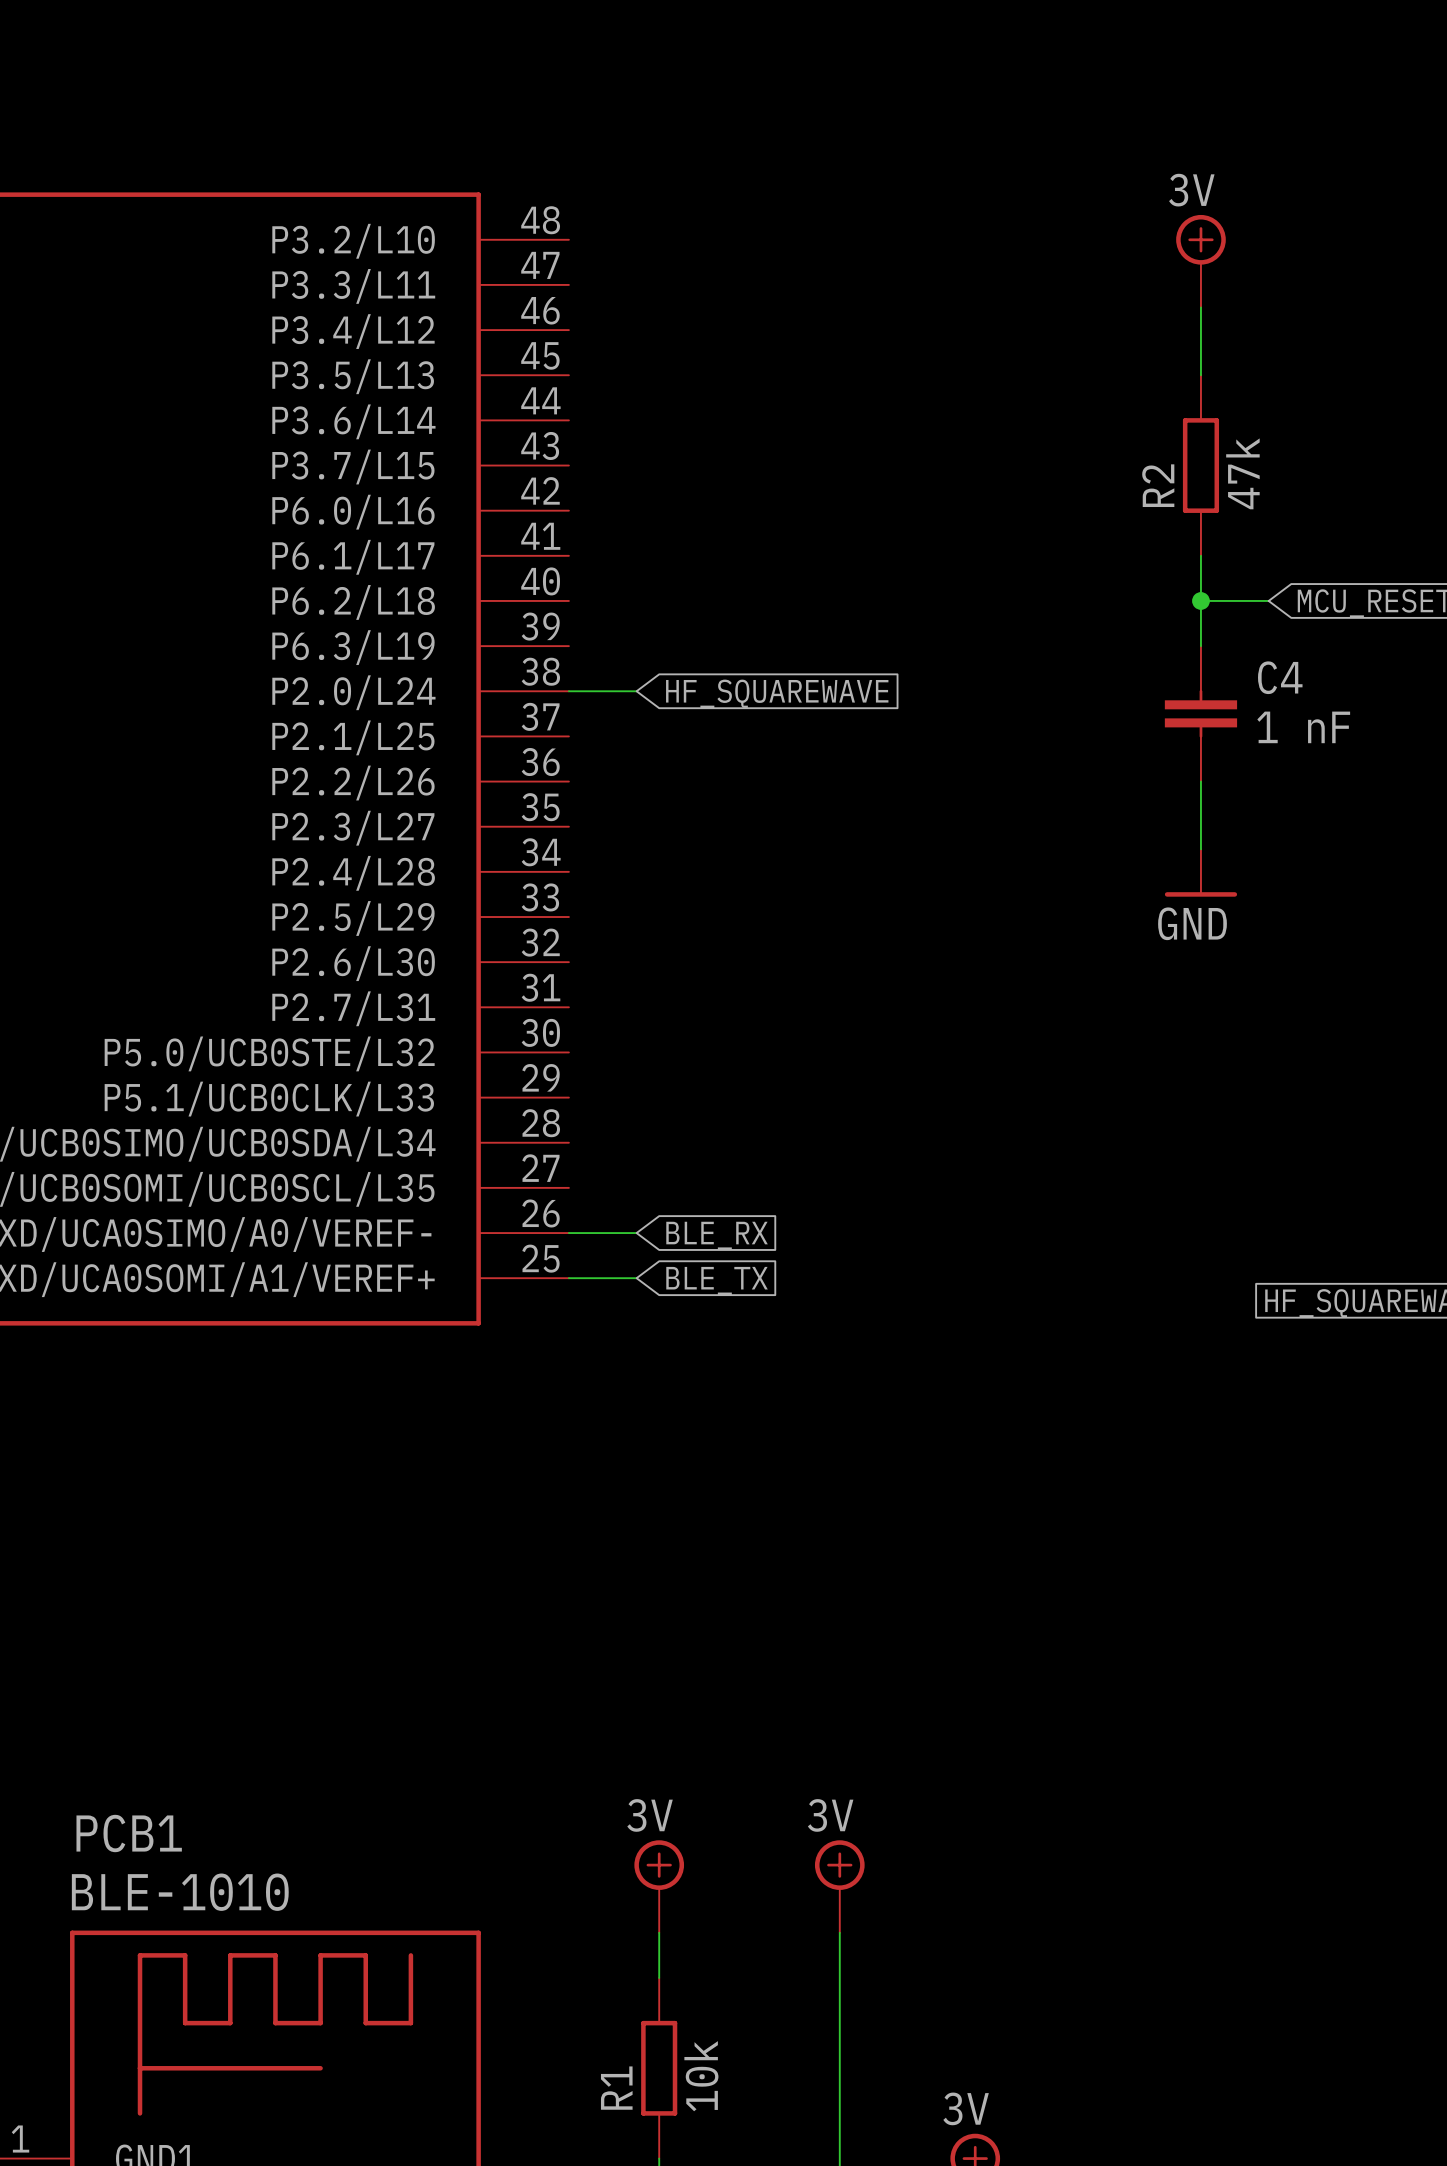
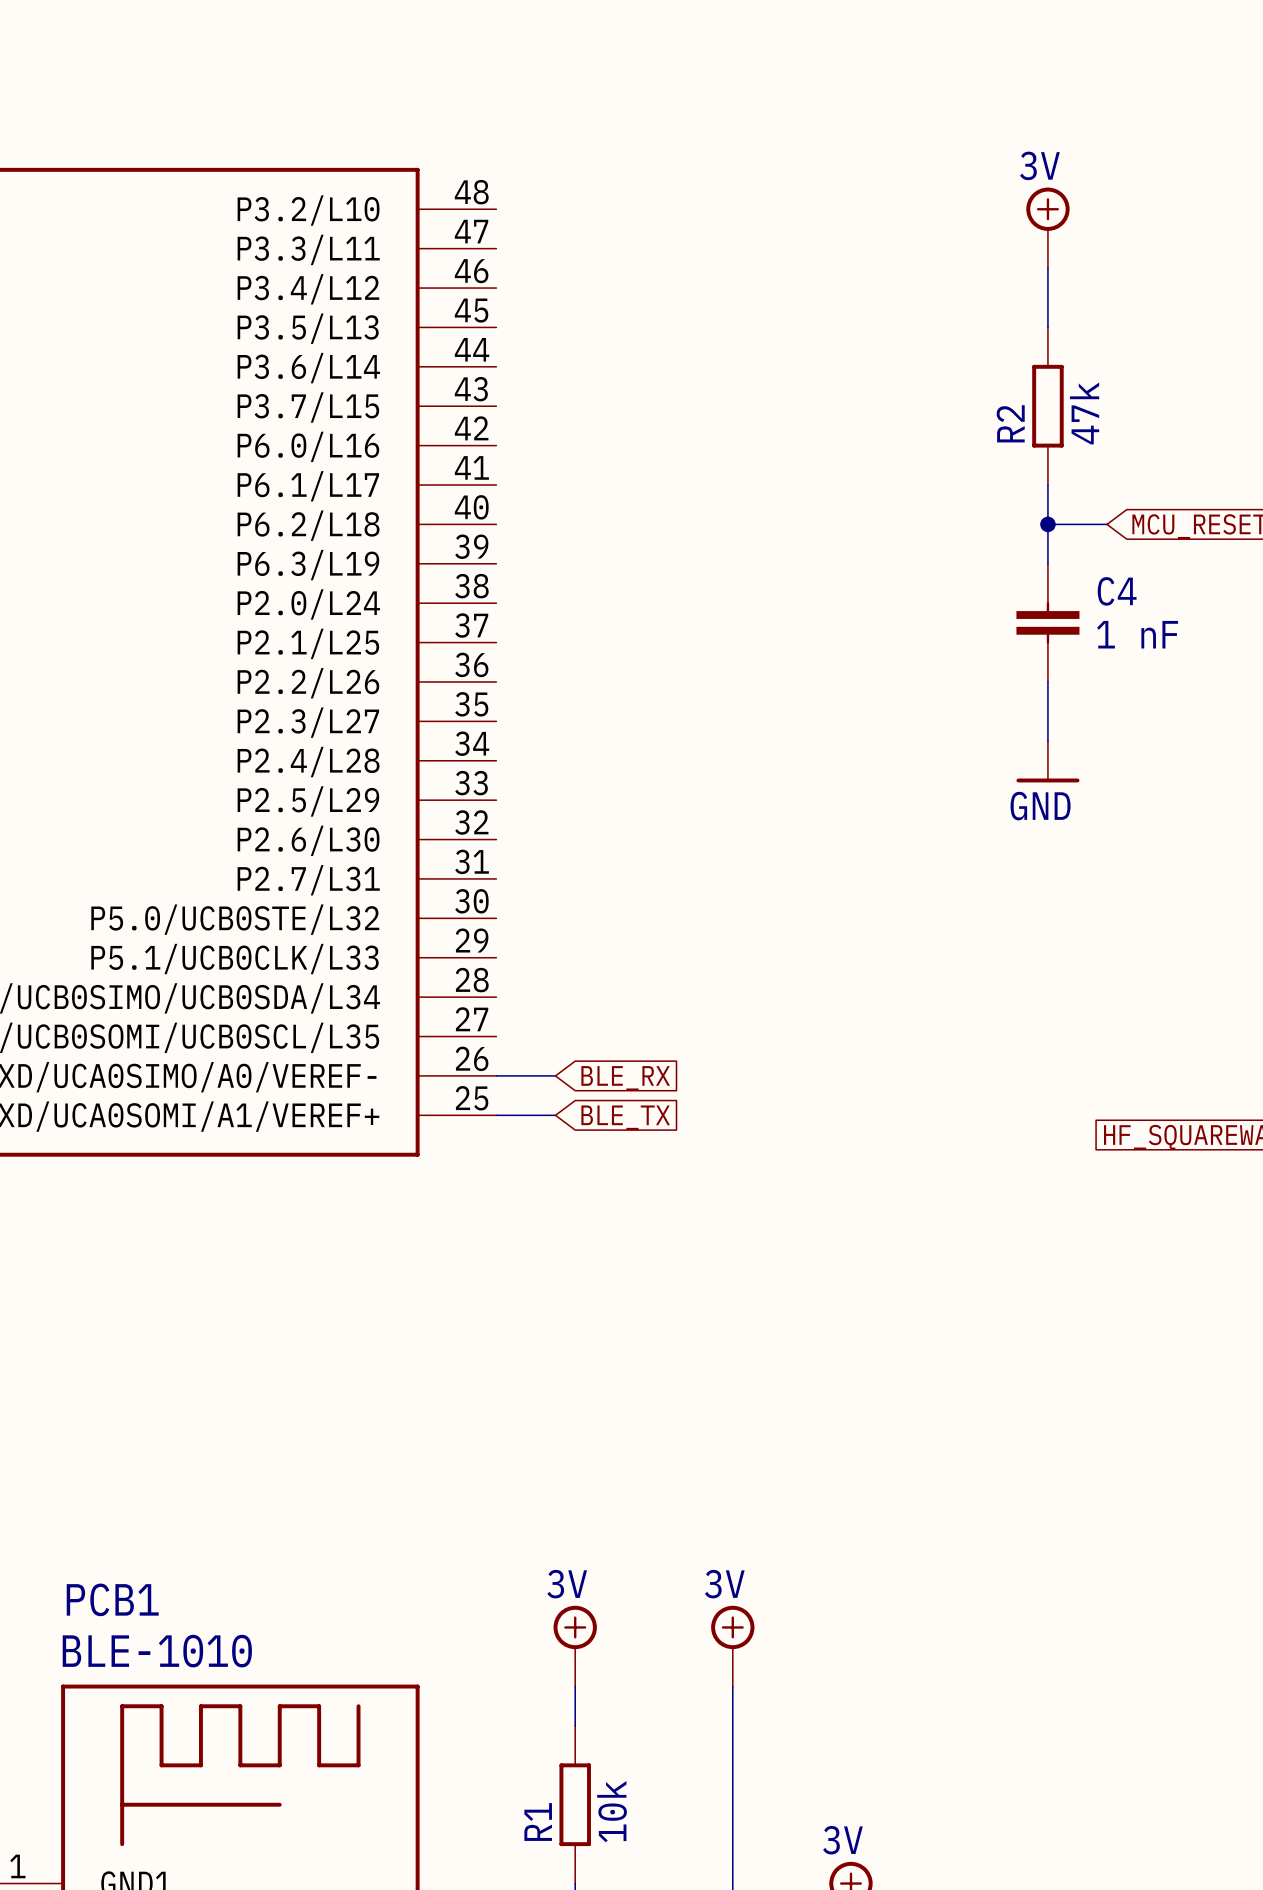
wire: (568, 691) (636, 691) -> none
global label: HF_SQUAREWAVE (777, 693) -> none

